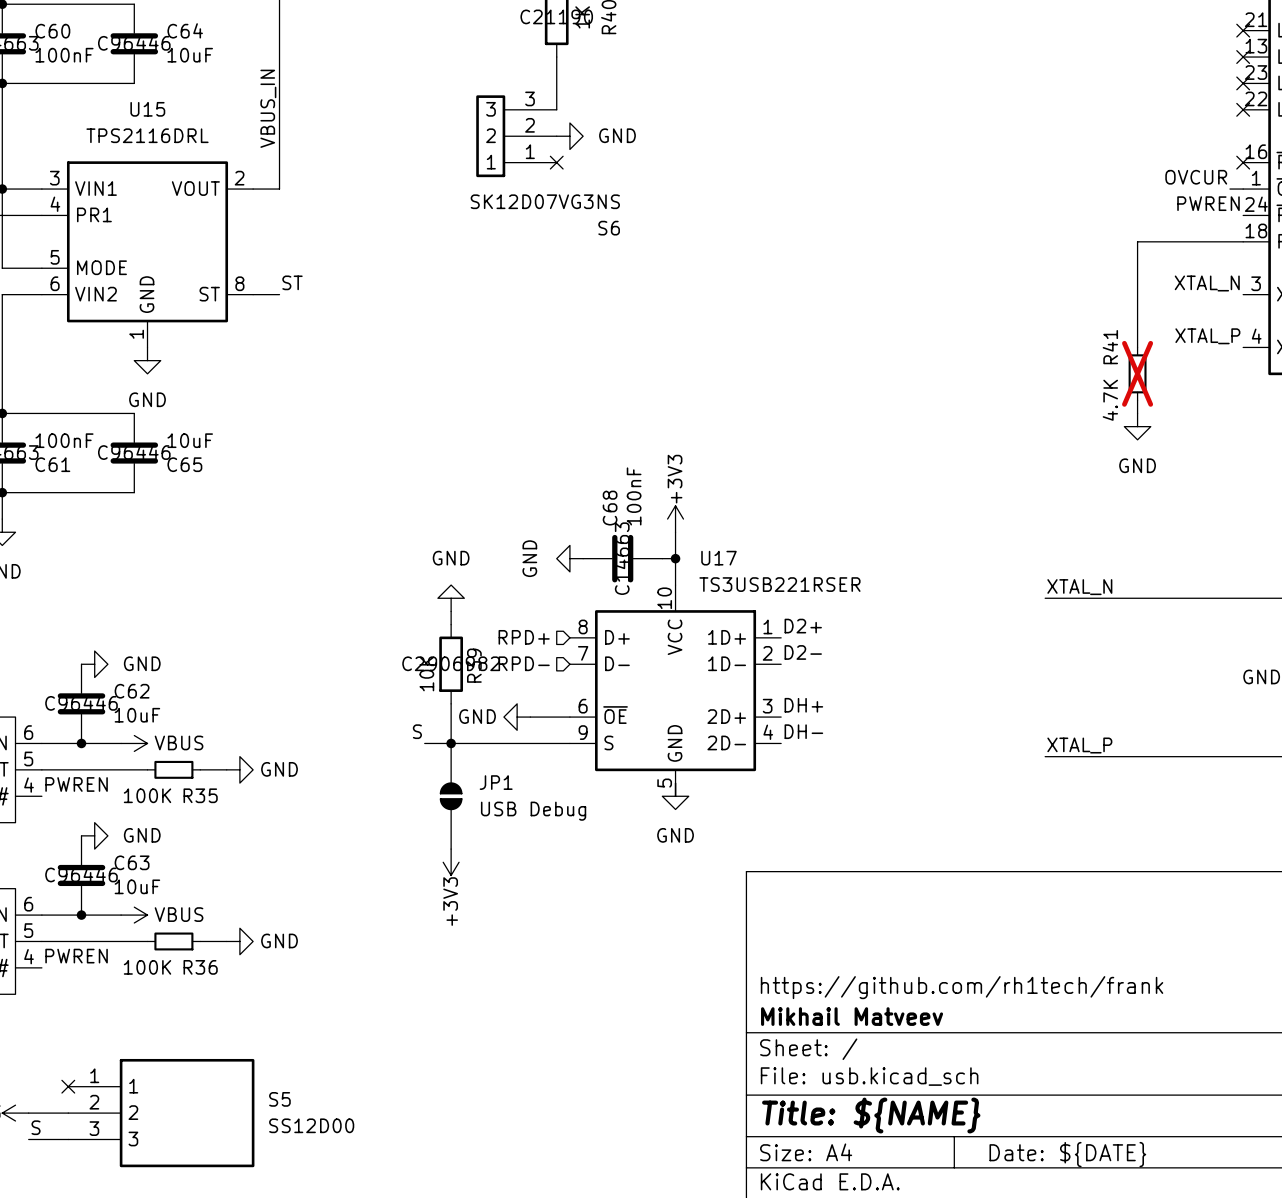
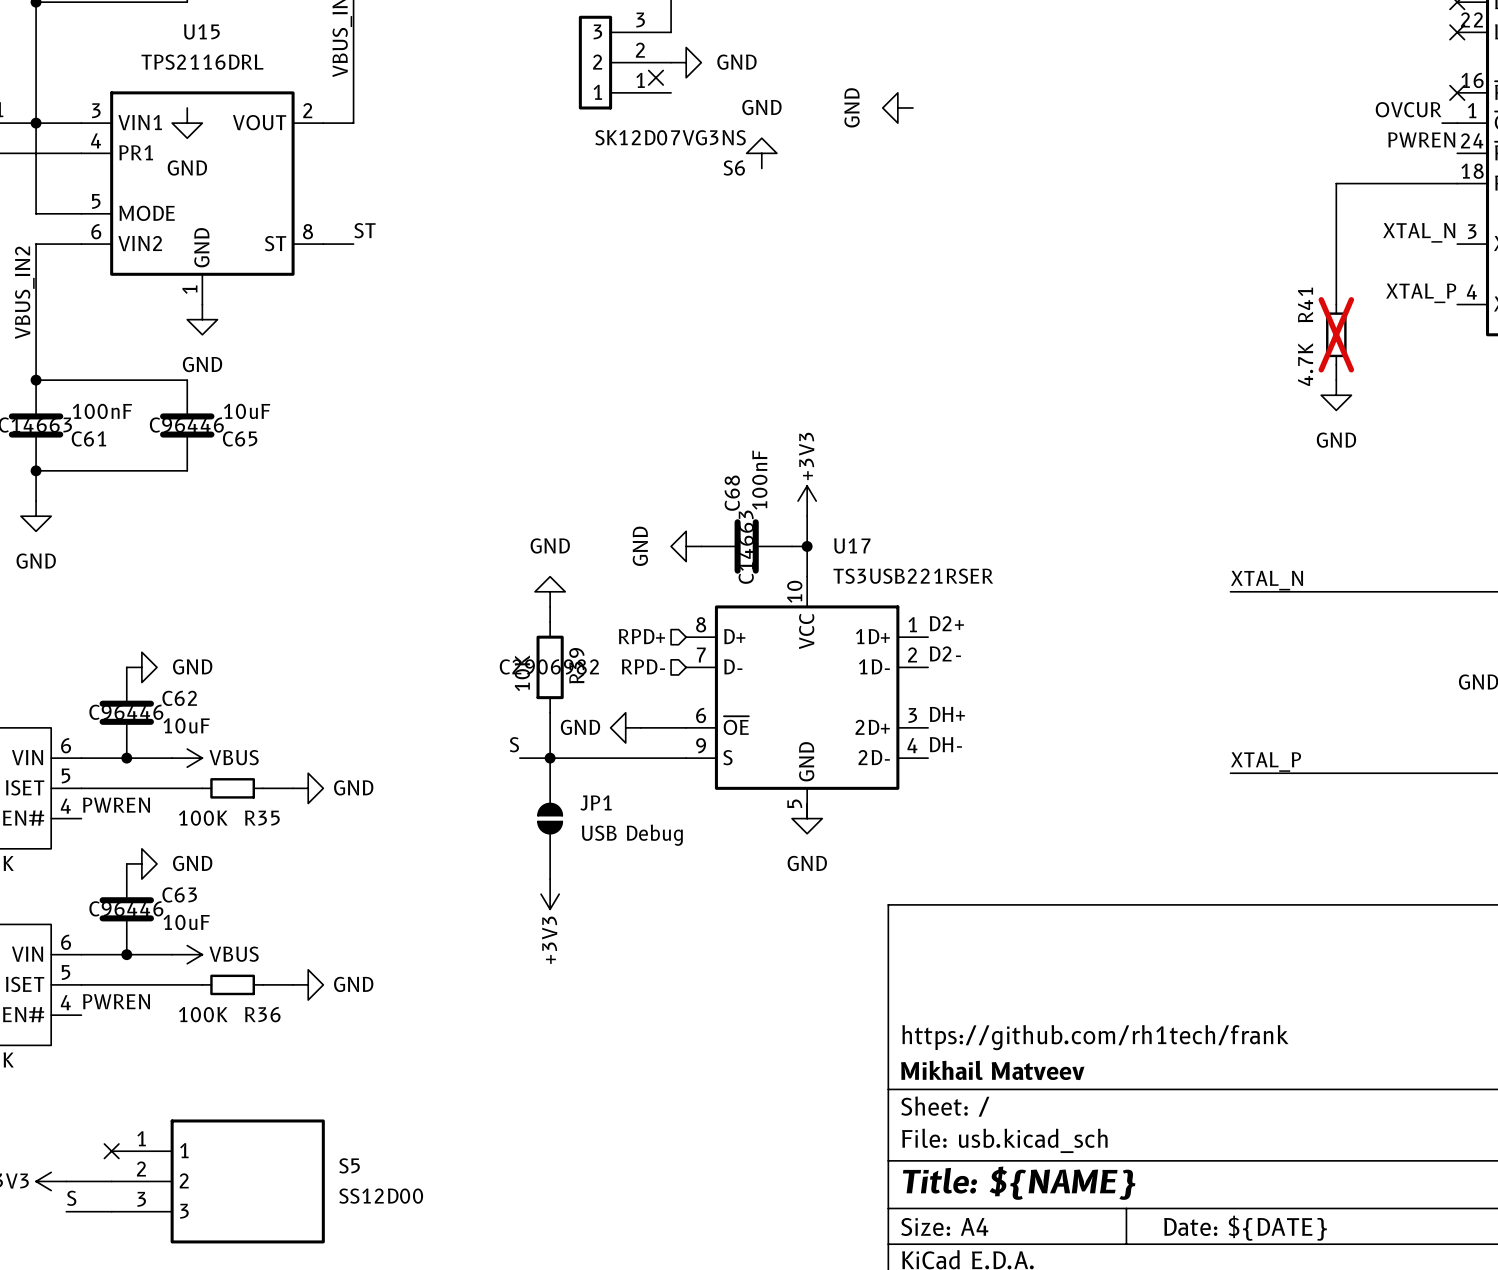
no-connect mark position: (556, 162) -> (655, 77)
power symbol: none -> GND (897, 107)
power symbol: none -> GND (187, 123)
power symbol: none -> GND (761, 153)

